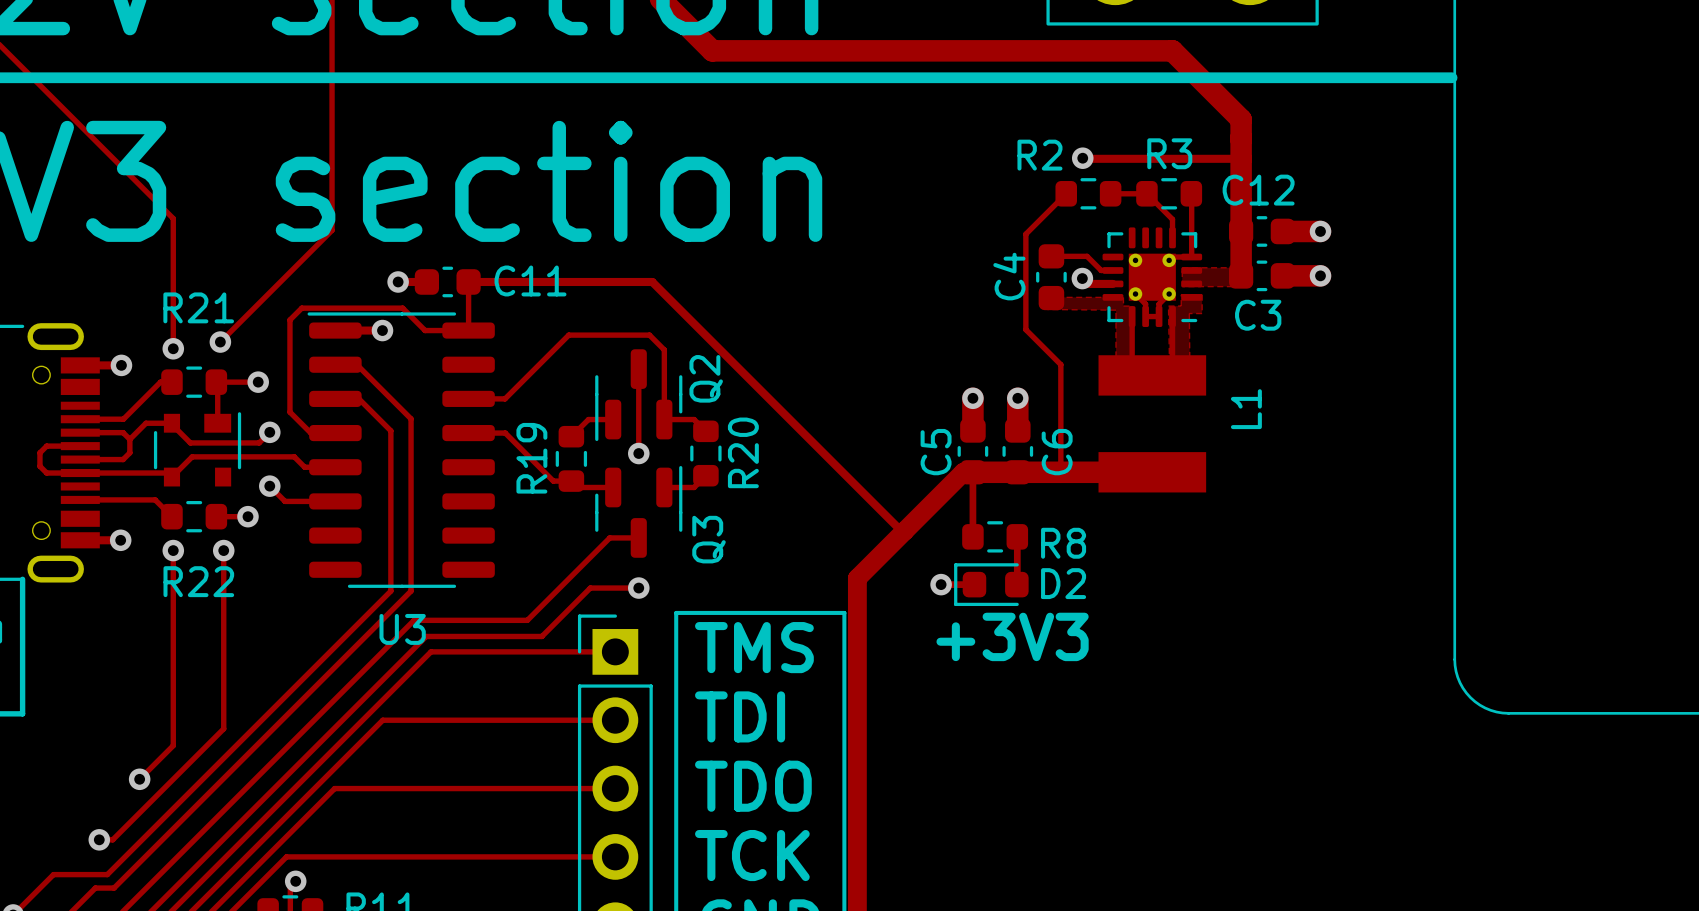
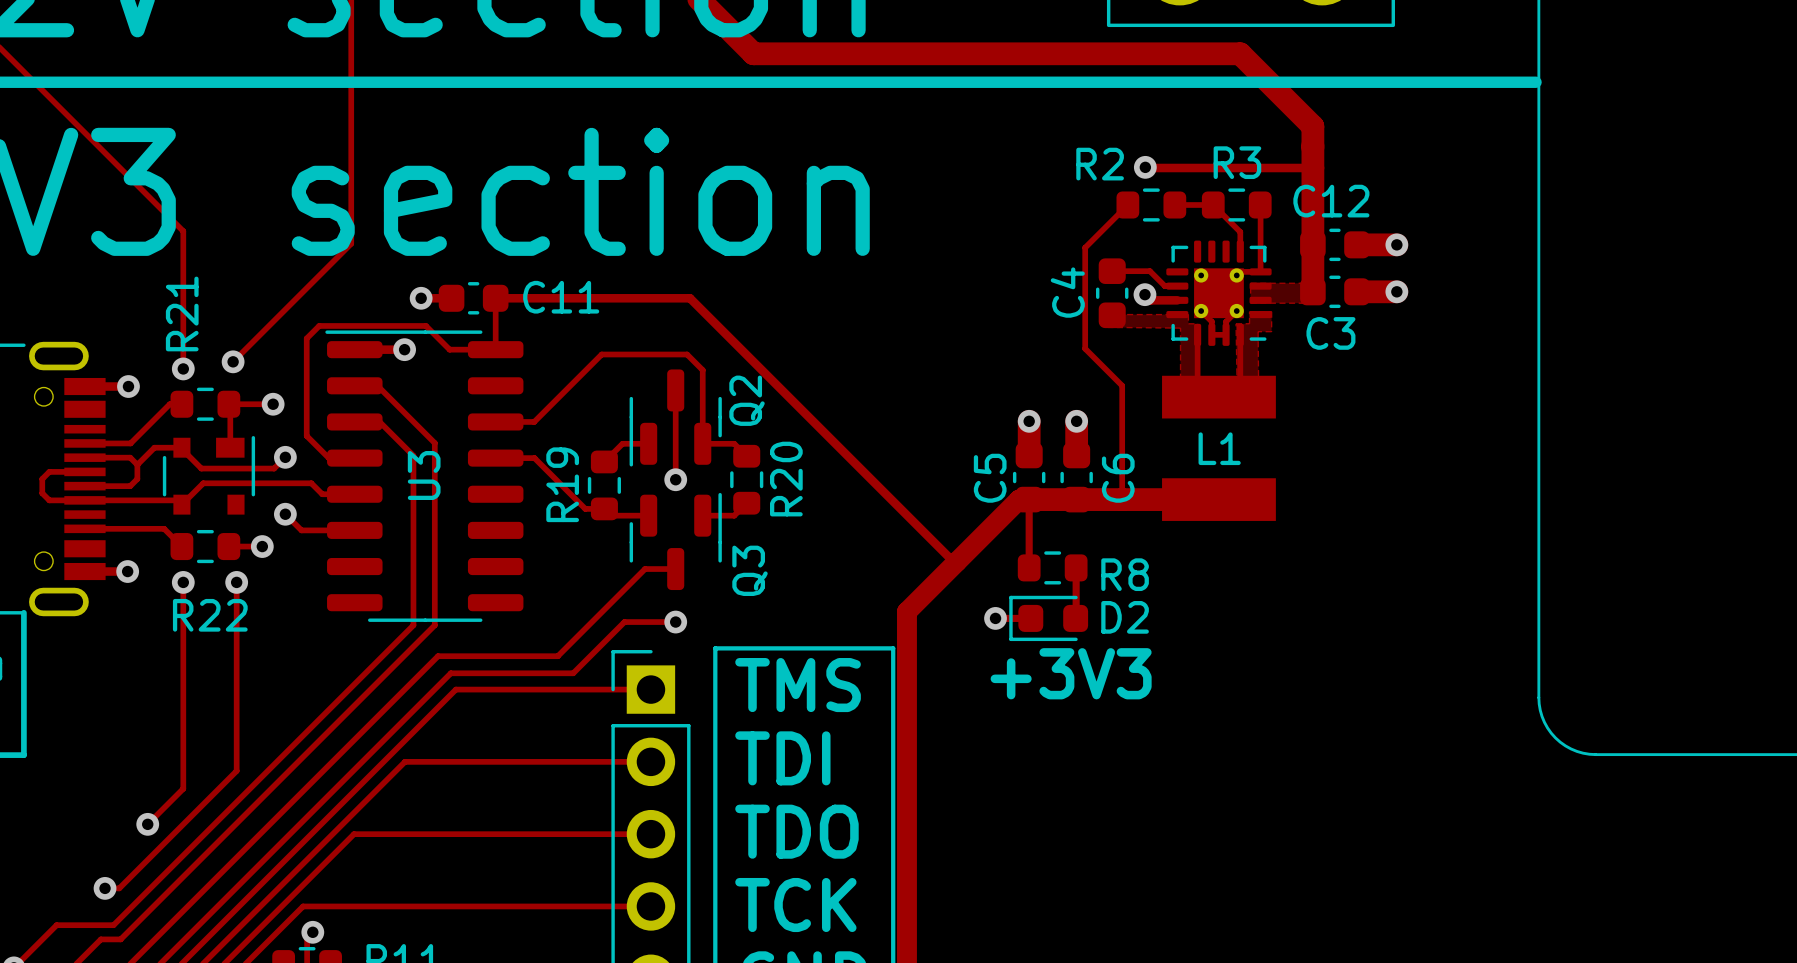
R21 name rotation: 0° (198, 307) -> 90° counterclockwise (182, 313)
L1 name rotation: 0° (1246, 409) -> 90° clockwise (1219, 448)
L1 name position: L1 (1246, 409) -> L1 (1219, 448)
U3 name rotation: 0° (402, 629) -> 90° counterclockwise (424, 475)
U3 name position: U3 (402, 629) -> U3 (424, 475)

